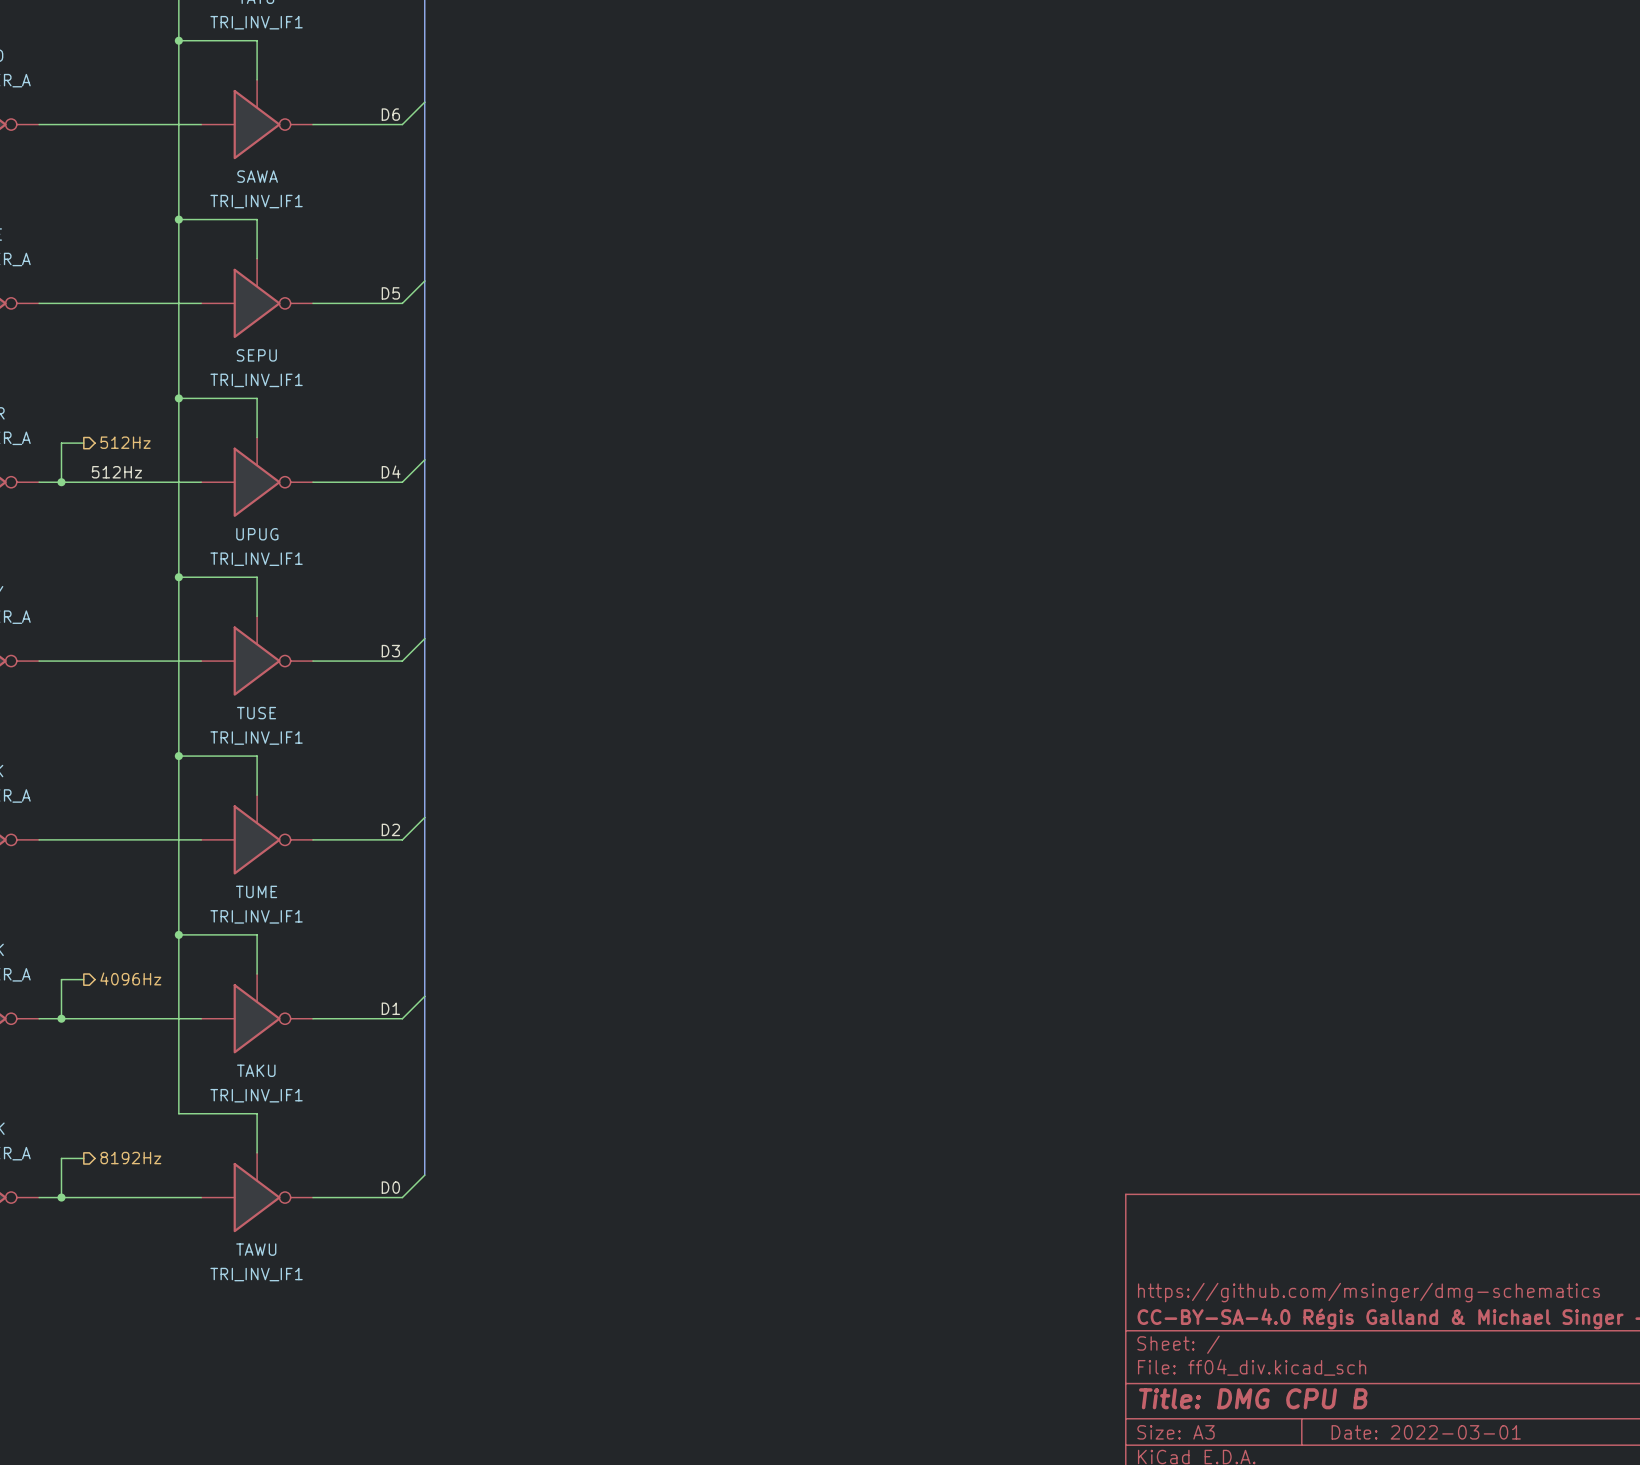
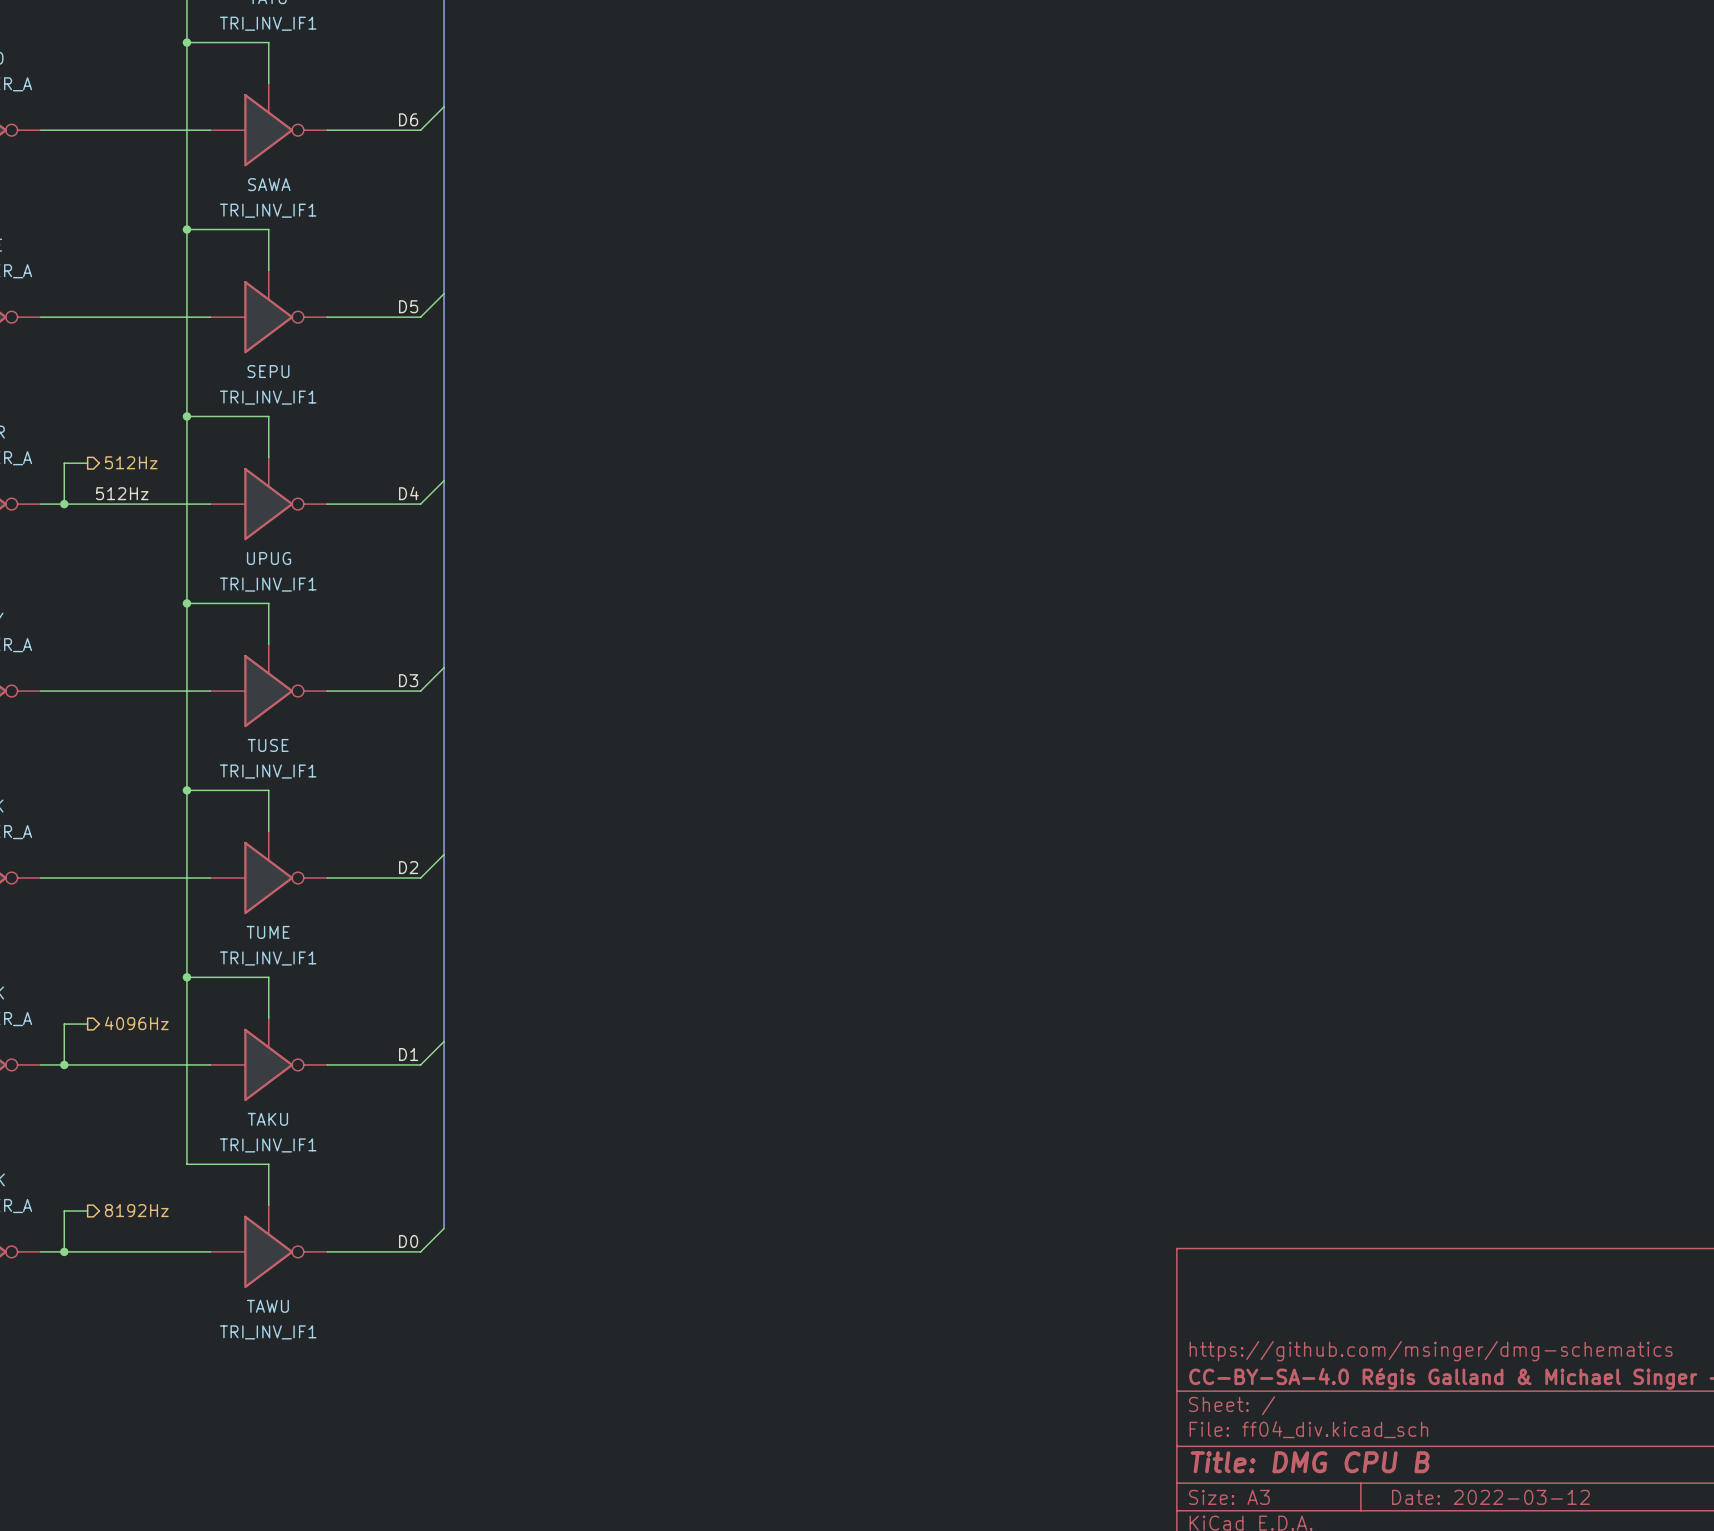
title block: Date: 2022-03-01 (1426, 1432) -> Date: 2022-03-12 (1490, 1497)

